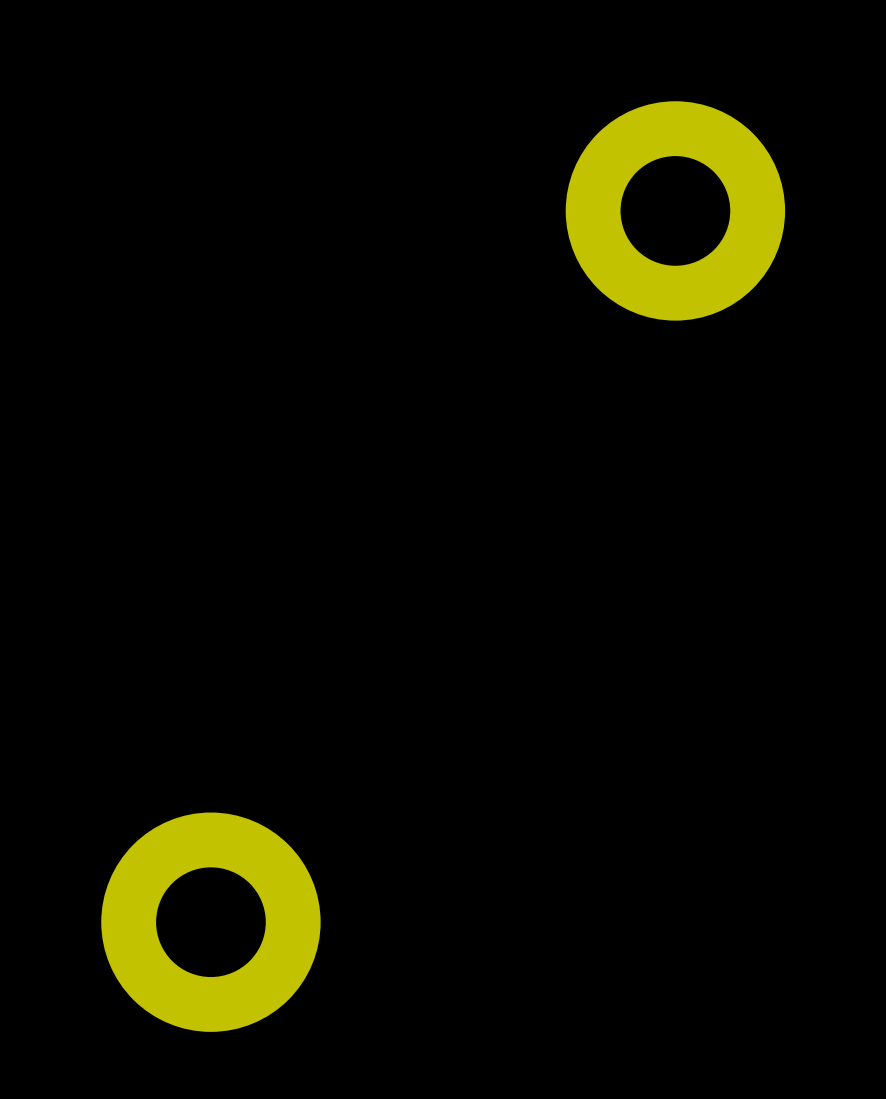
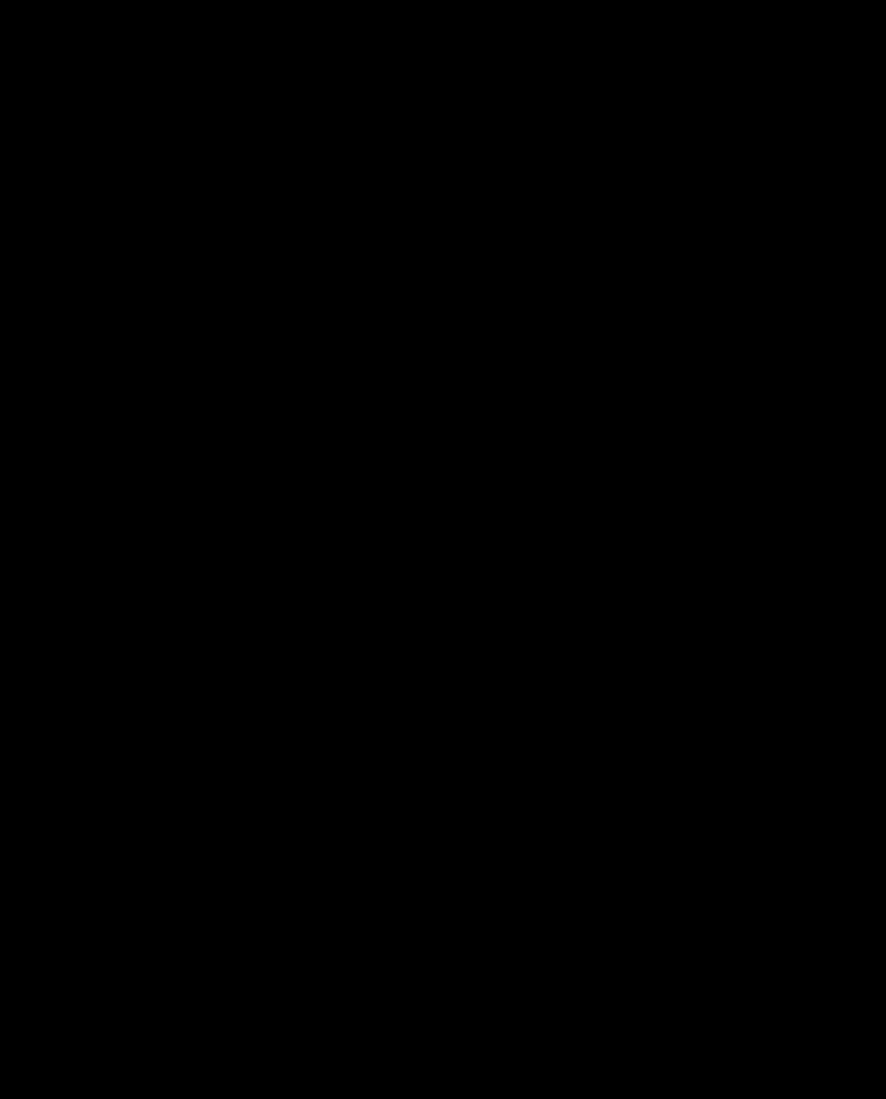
part: (675, 210) -> none
part: (210, 922) -> none

